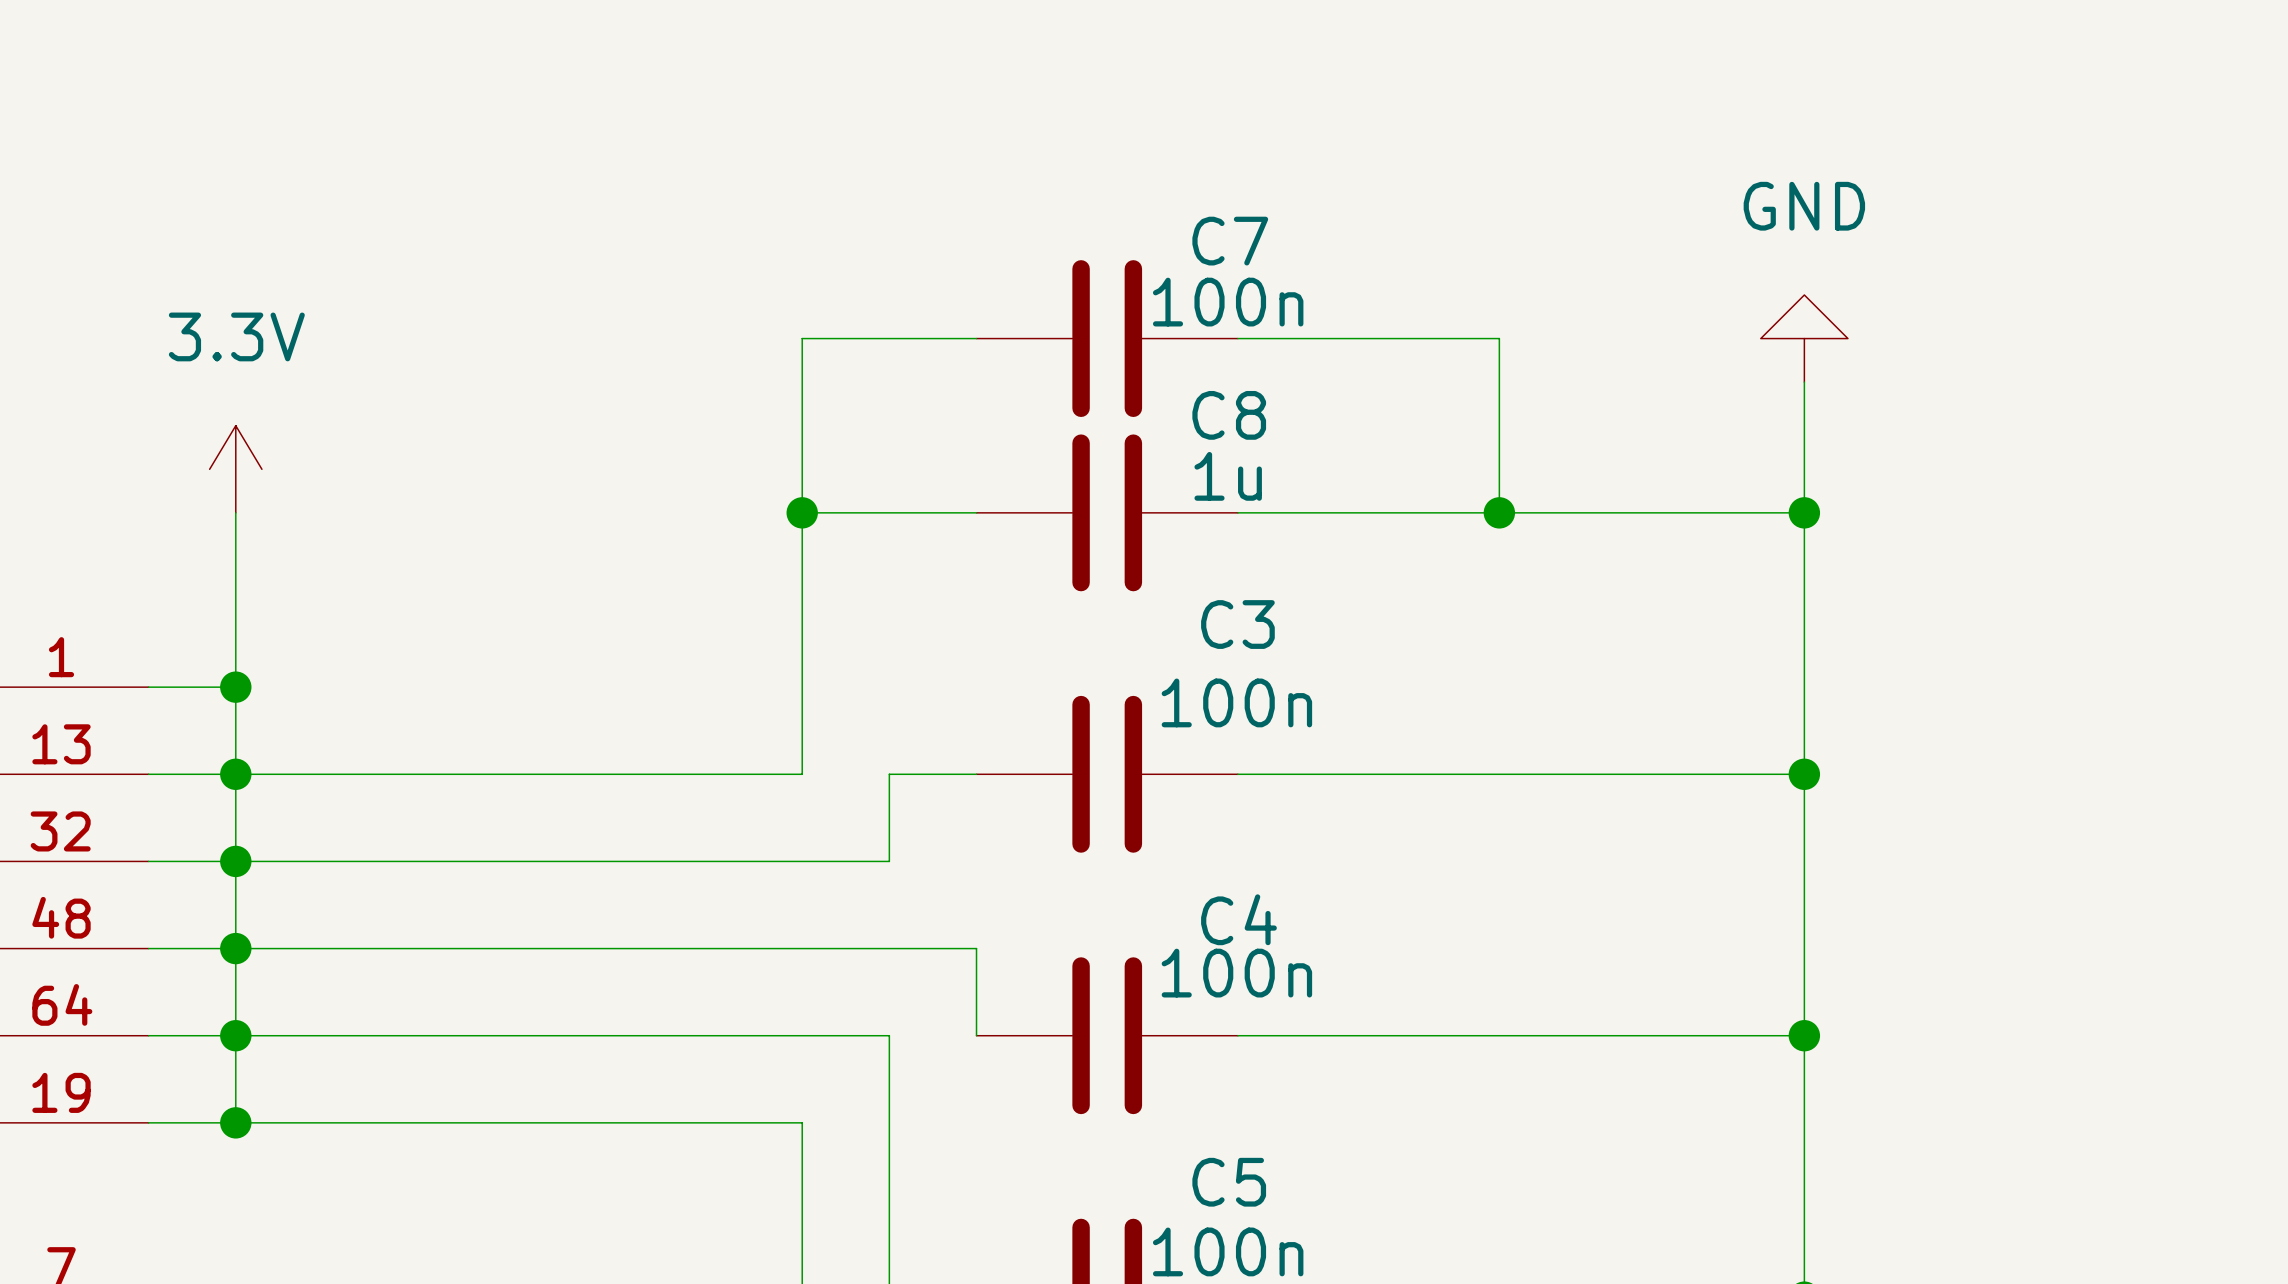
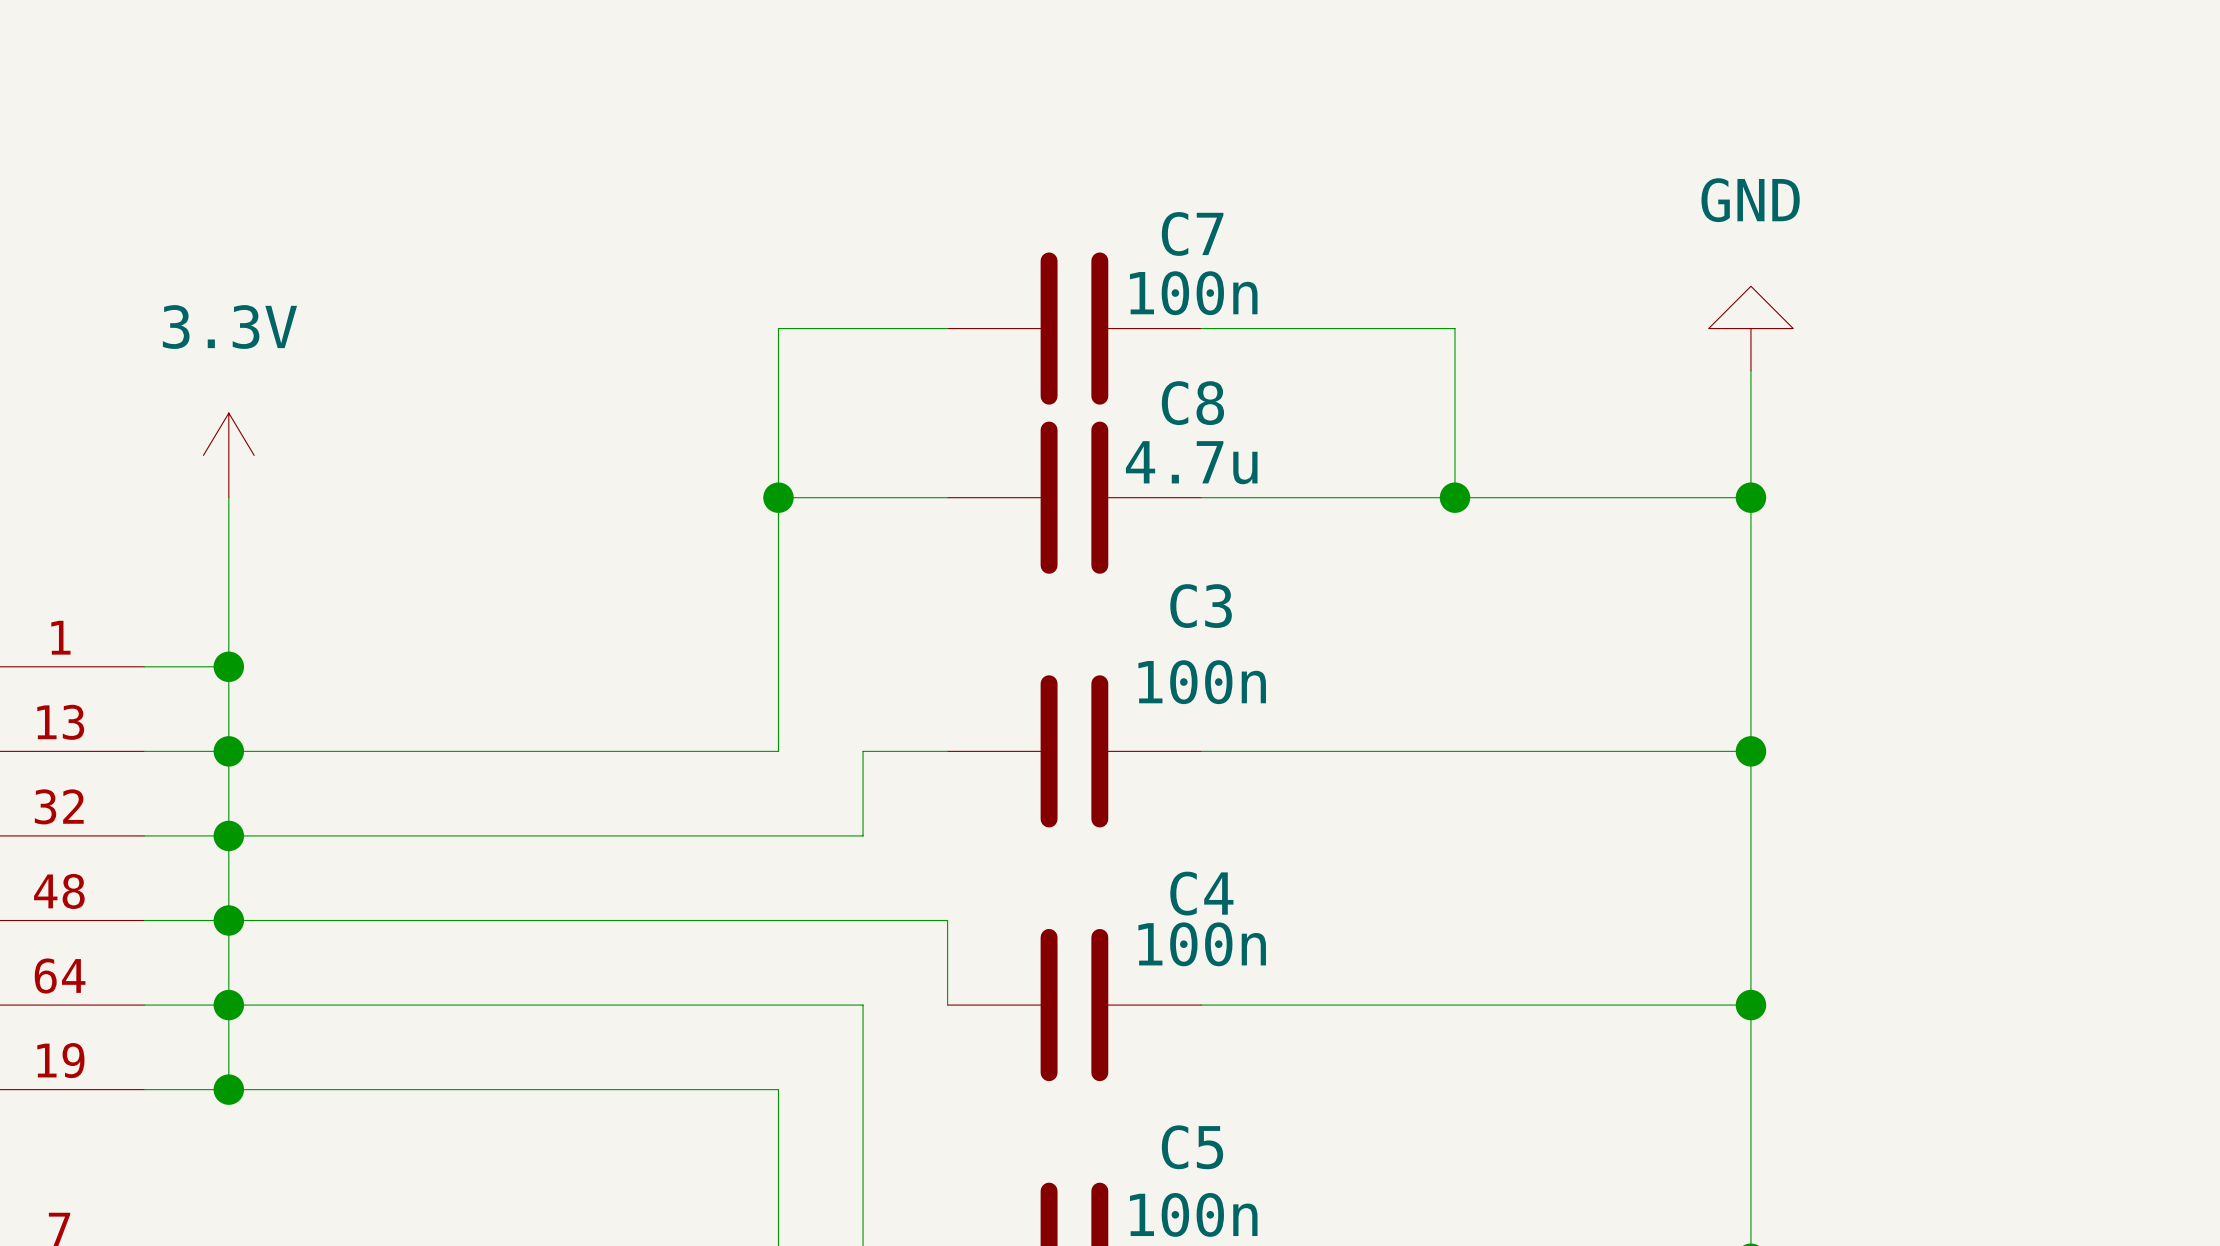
C8 value: 1u (1228, 476) -> 4.7u (1191, 462)

